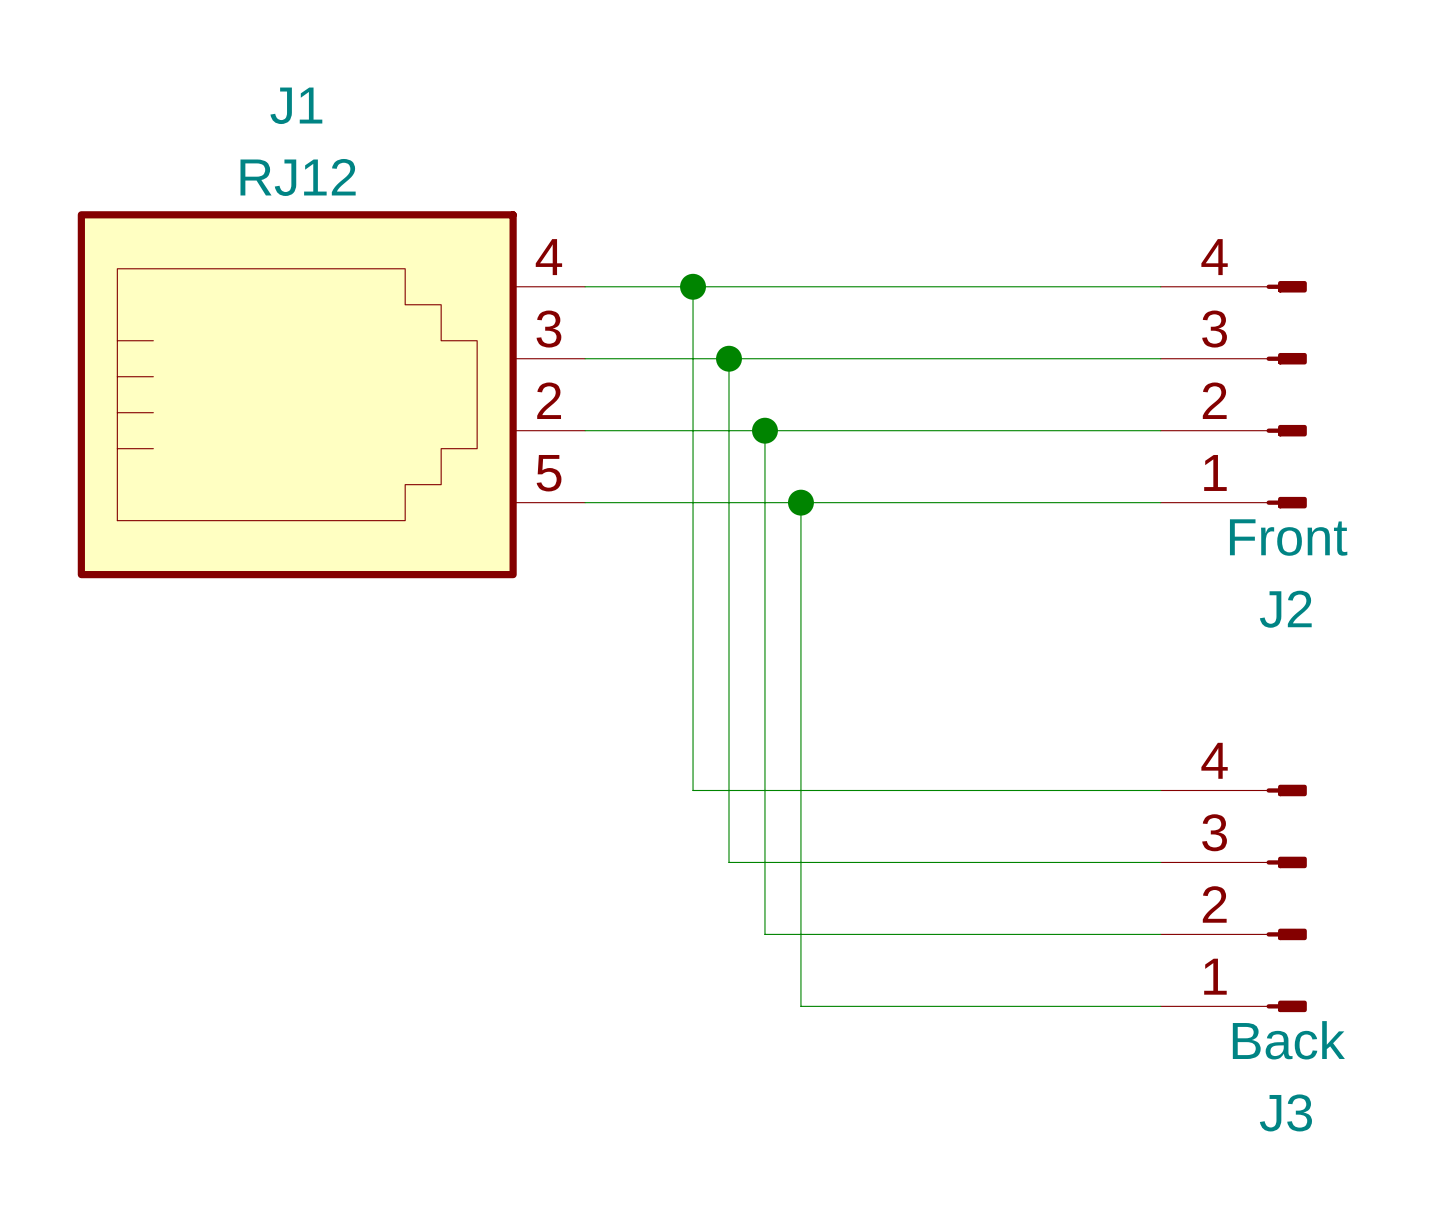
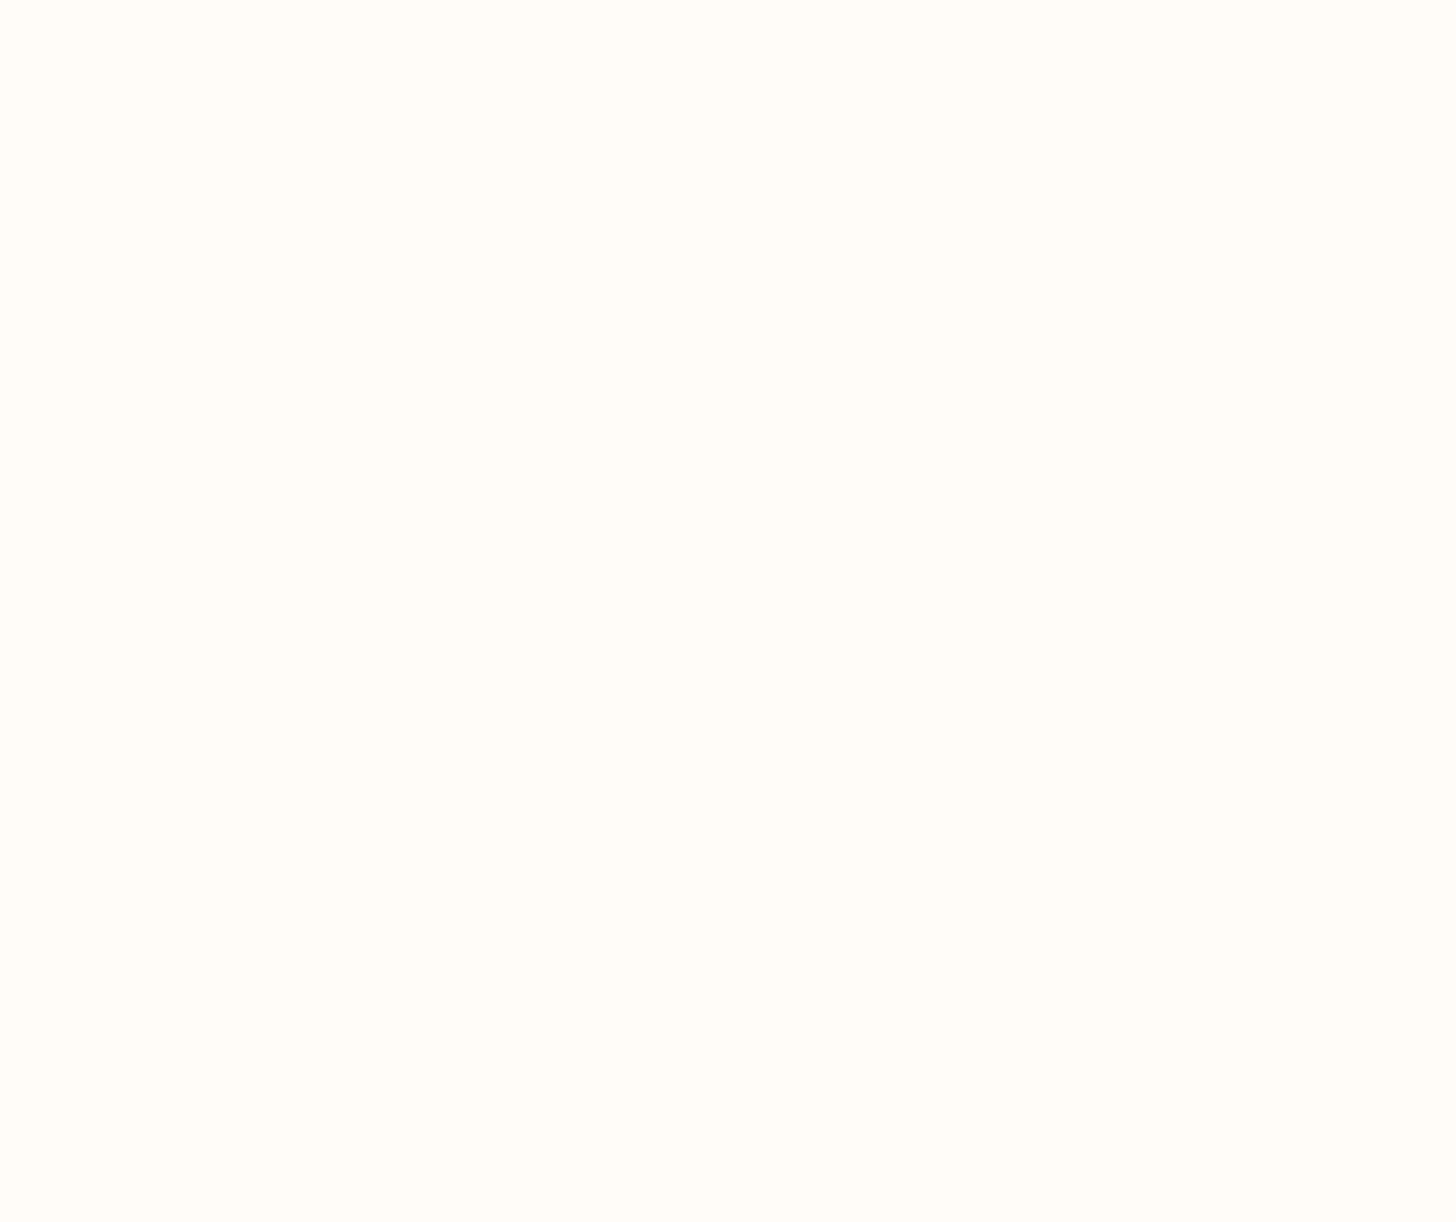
wire: (585, 286) (1160, 286) -> none
wire: (693, 286) (693, 790) (1160, 790) -> none
junction: (693, 286) -> none
wire: (585, 358) (1160, 358) -> none
wire: (729, 358) (729, 862) (1160, 862) -> none
junction: (729, 358) -> none
J1: RJ12 (331, 394) -> none
J2: Front (1233, 394) -> none
wire: (585, 430) (1160, 430) -> none
wire: (764, 430) (764, 934) (1160, 934) -> none
junction: (764, 430) -> none
wire: (585, 502) (1160, 502) -> none
wire: (800, 502) (800, 1006) (1160, 1006) -> none
junction: (800, 502) -> none
J3: Back (1233, 898) -> none

